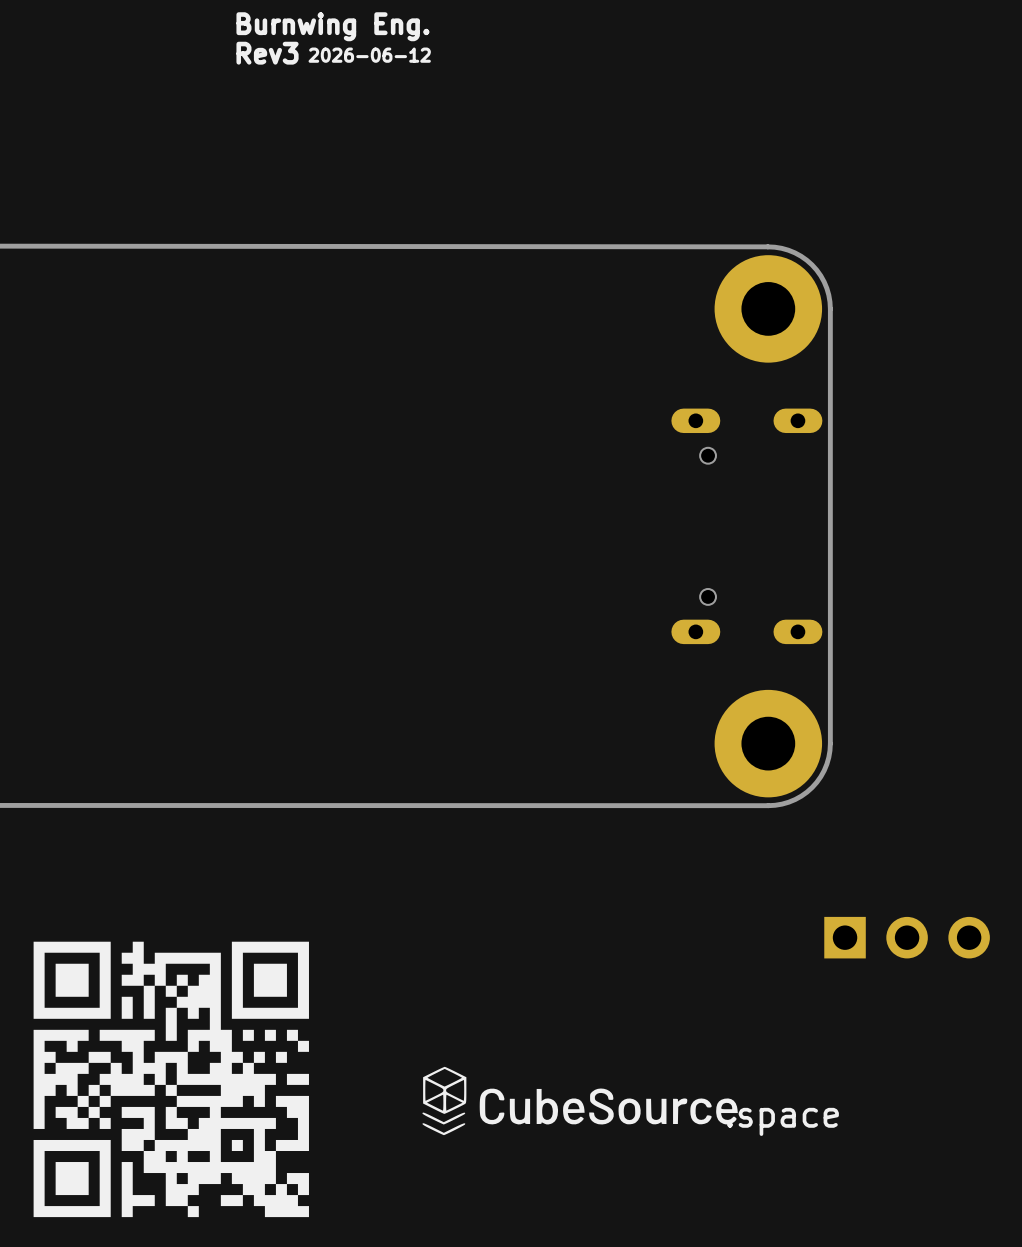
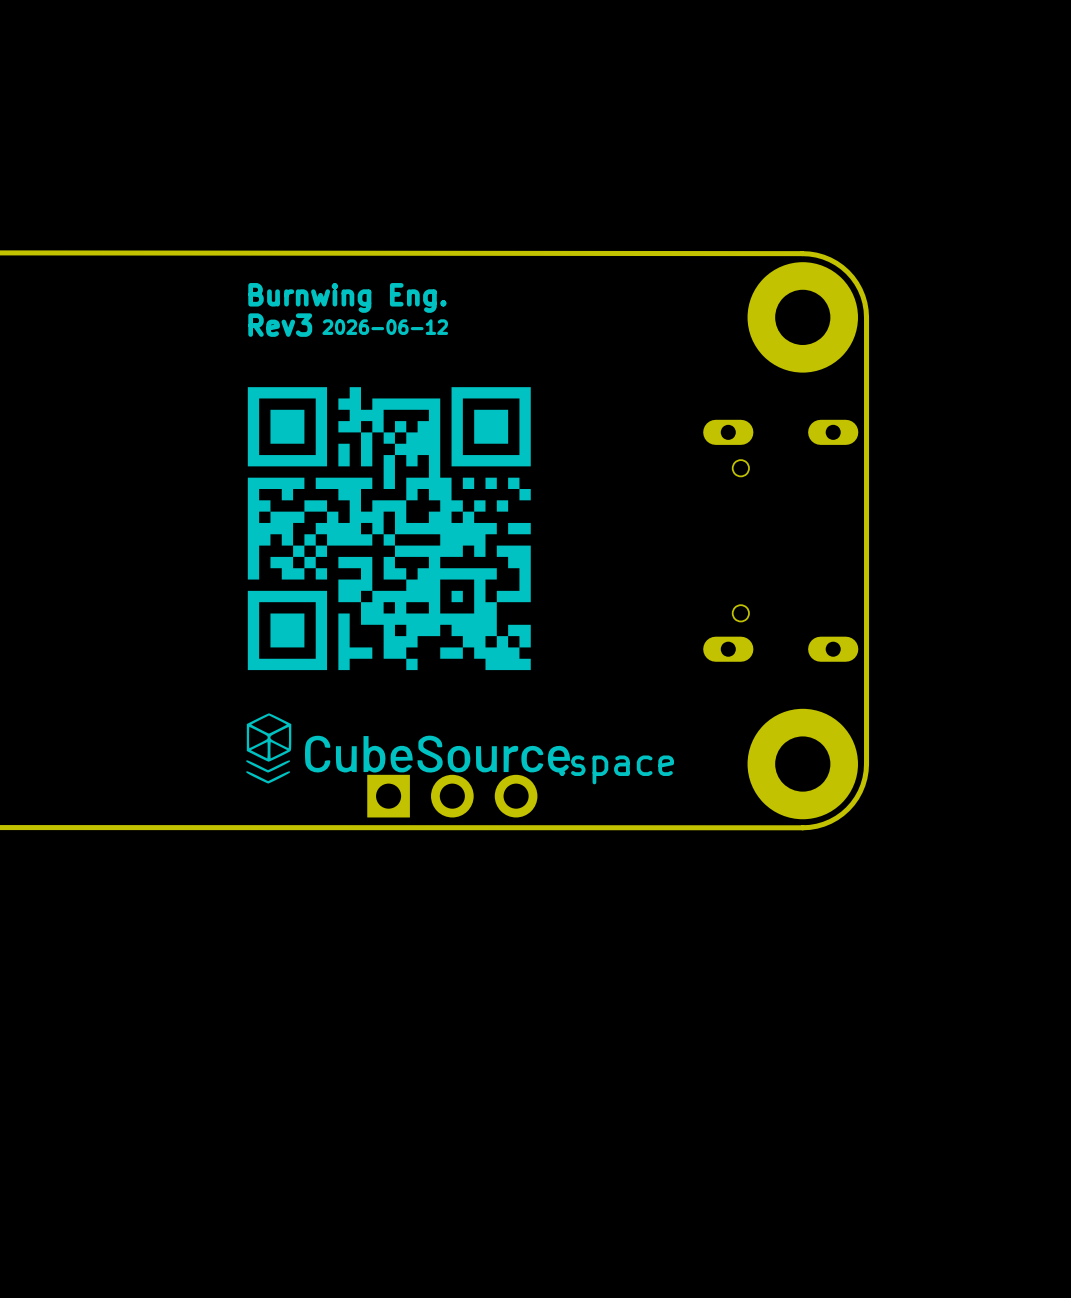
text position: Burnwing Eng. (332, 26) -> Burnwing Eng. (347, 297)
text position: Rev3 (267, 53) -> Rev3 (280, 325)
text position: 2026-06-12 (369, 55) -> 2026-06-12 (385, 327)
part position: (907, 937) -> (452, 796)
drawing position: (171, 1079) -> (389, 528)
.space position: (580, 1100) -> (408, 748)

